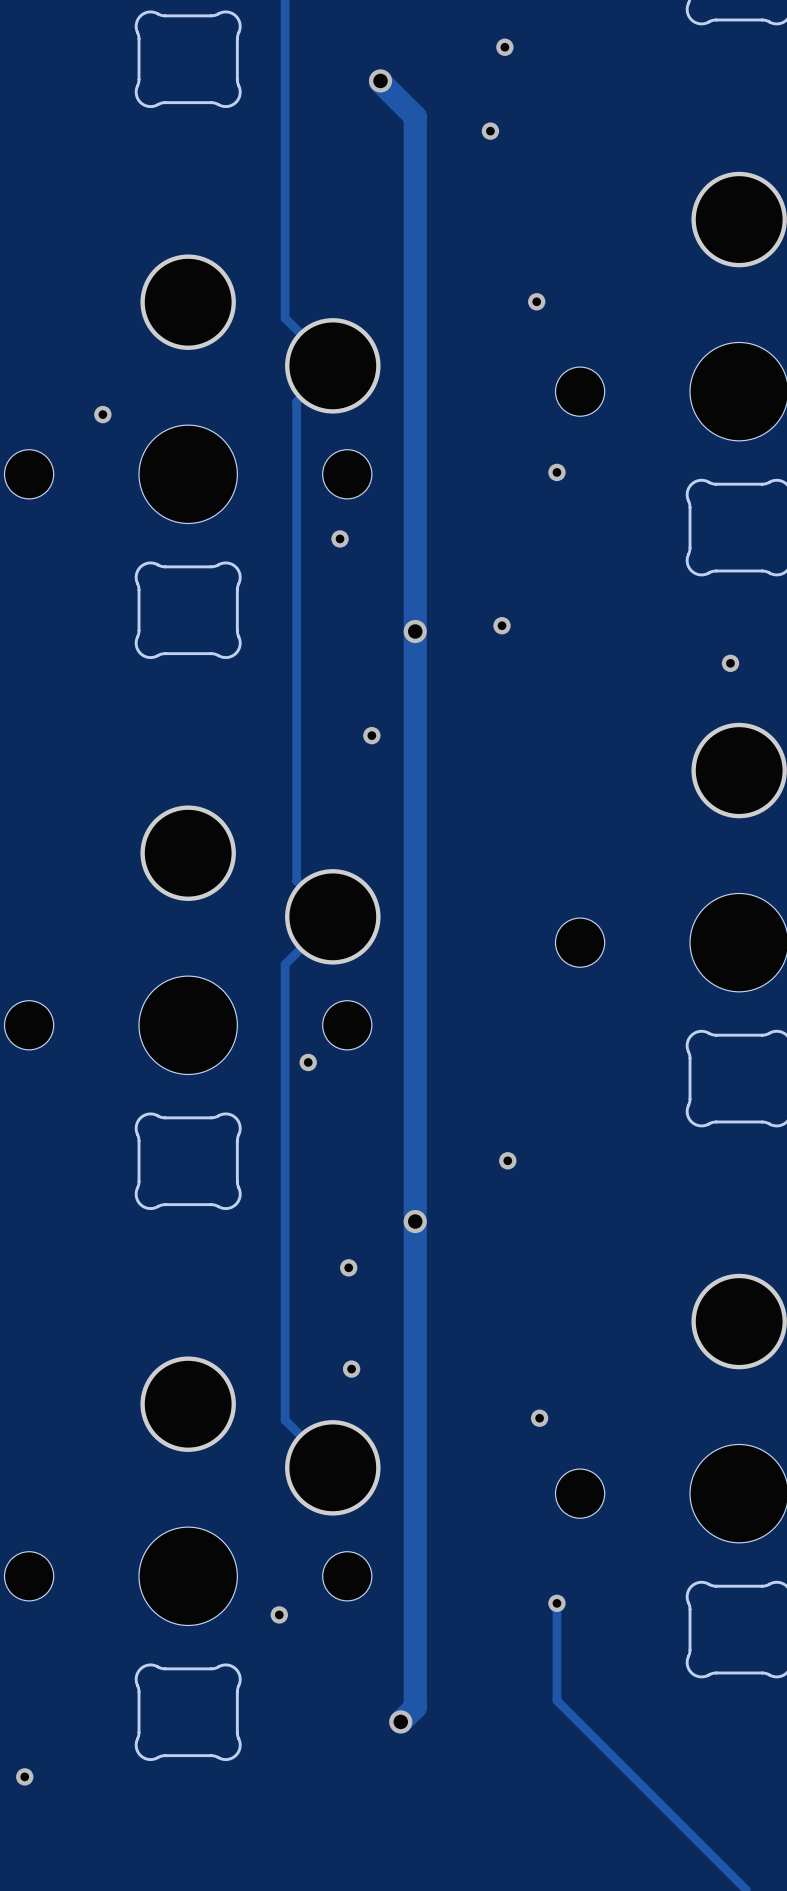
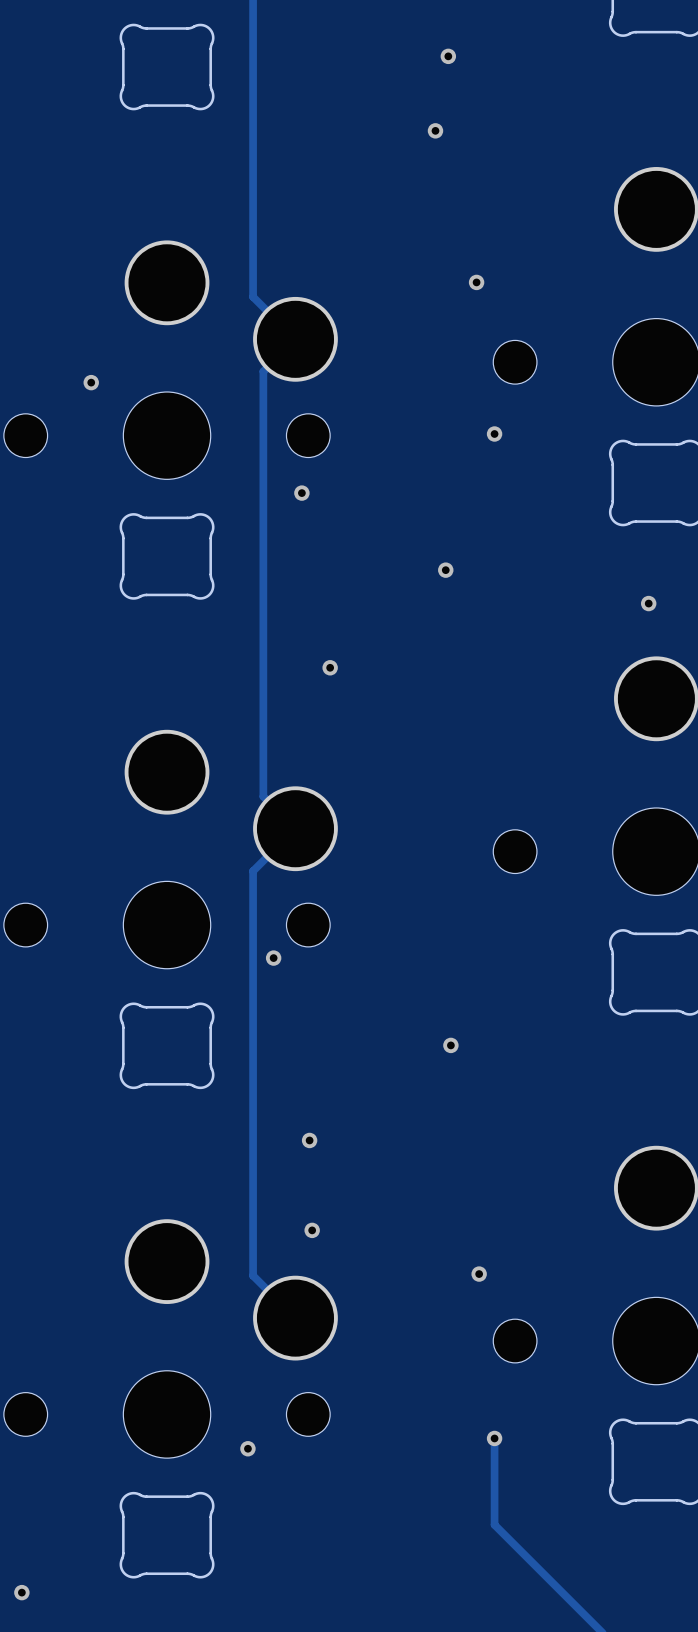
track: (380, 80) (415, 116) (415, 1707) (400, 1721) -> none
via: (380, 80) -> none
via: (415, 631) -> none
via: (415, 1221) -> none
via: (400, 1721) -> none

